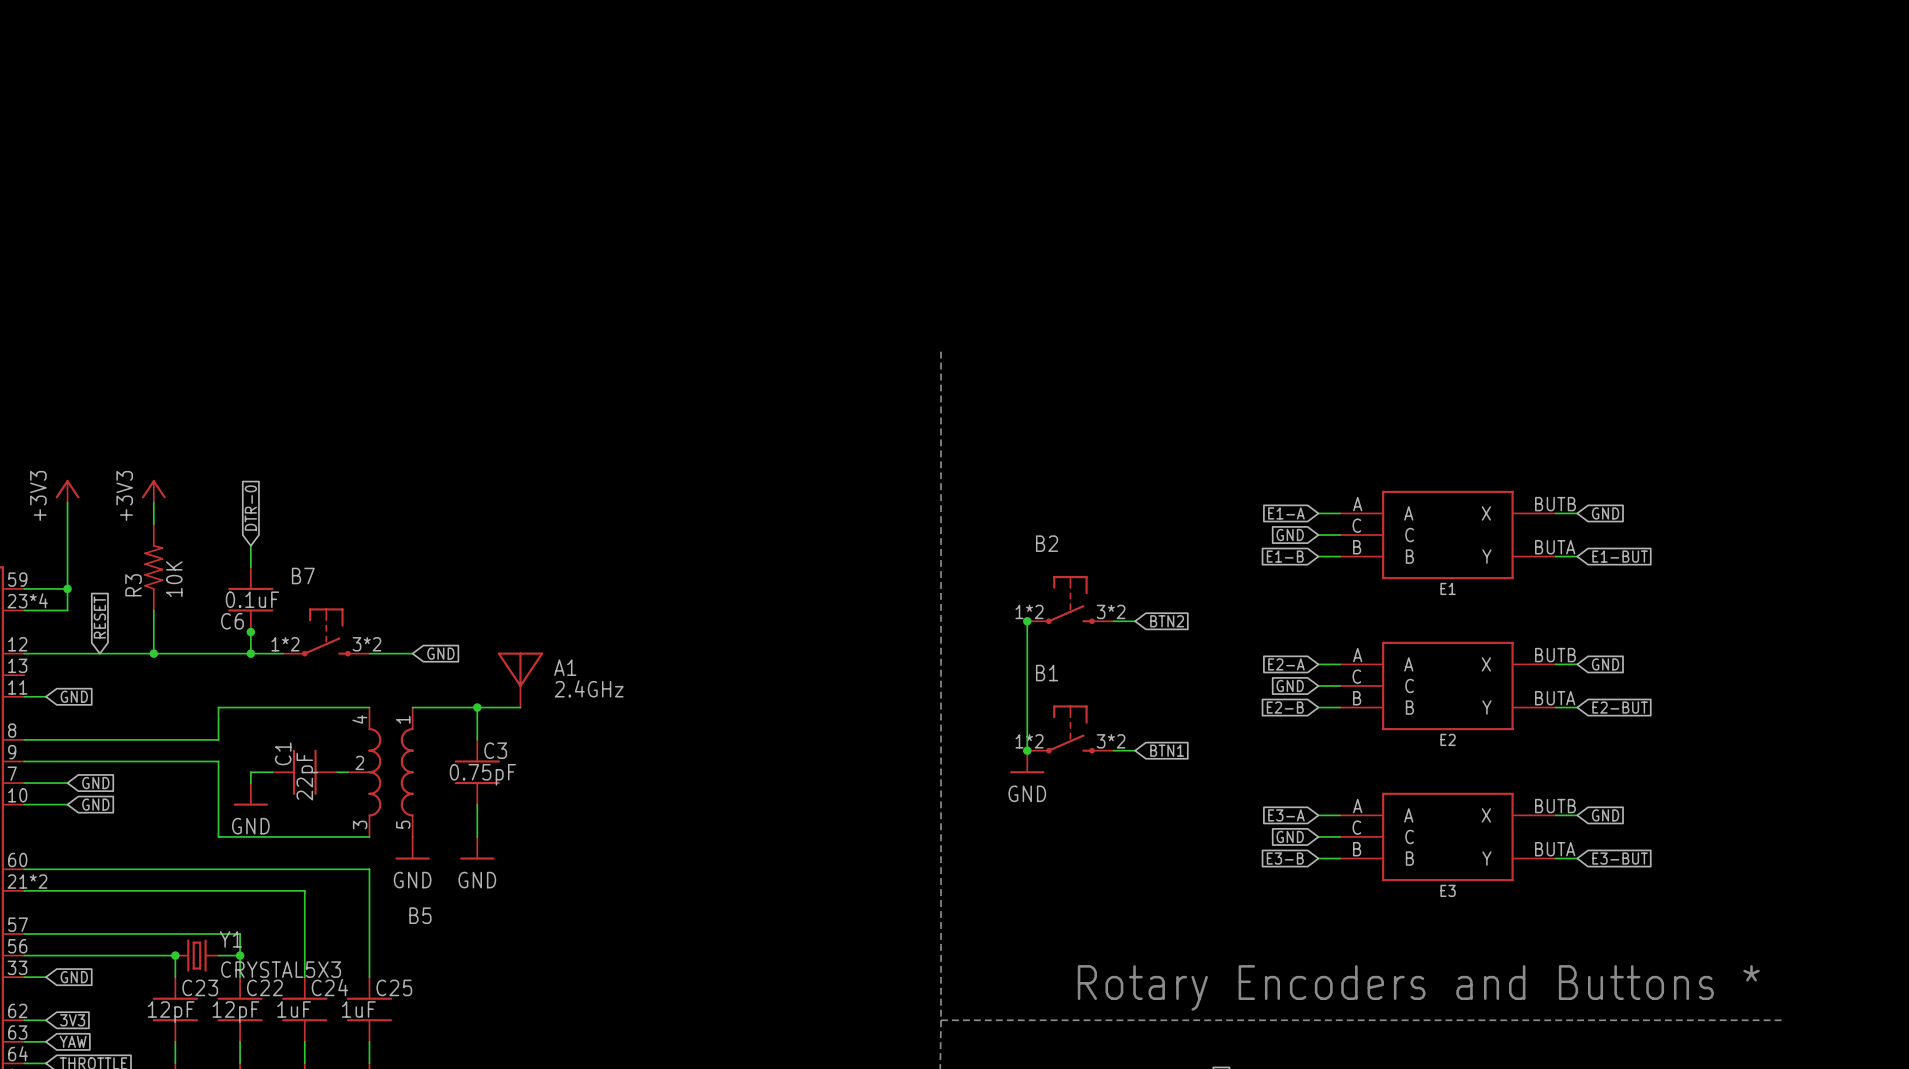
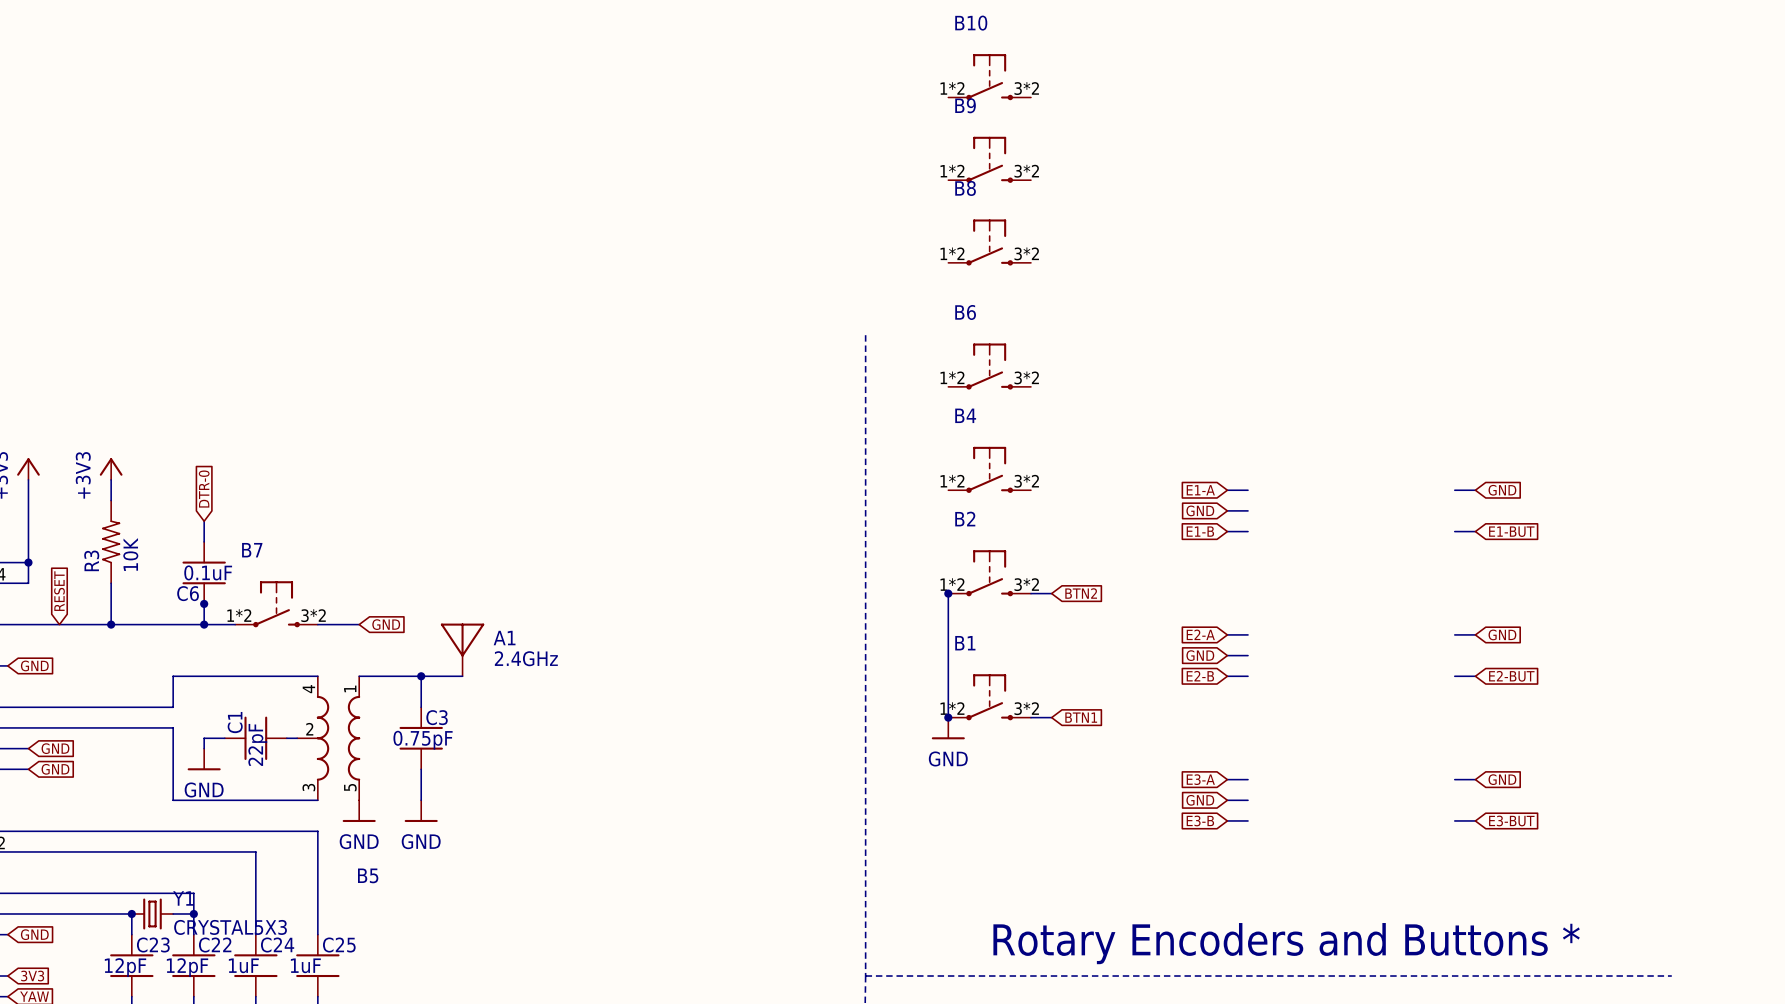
B10: none -> (989, 77)
B9: none -> (989, 159)
B8: none -> (989, 242)
B6: none -> (989, 366)
B4: none -> (989, 469)
E1: (1447, 535) -> none
E2: (1447, 685) -> none
E3: (1447, 836) -> none

